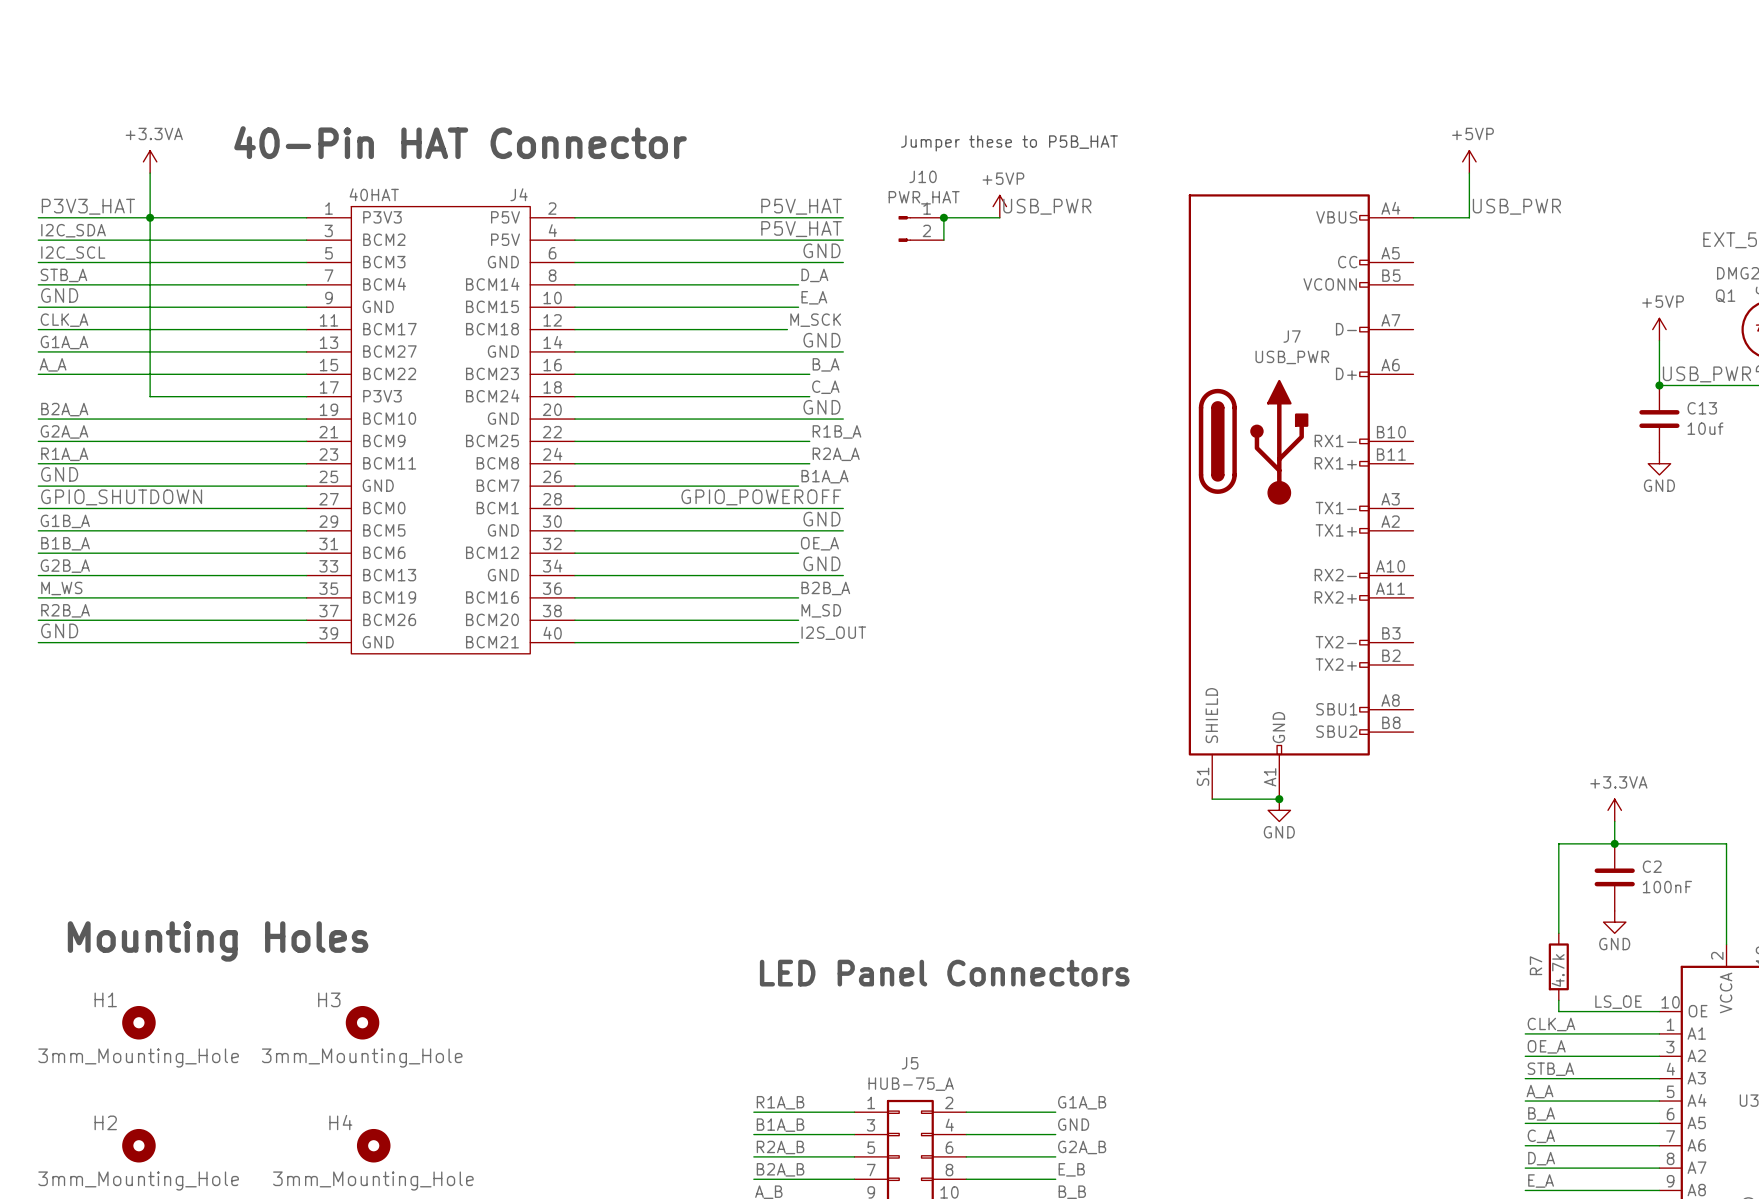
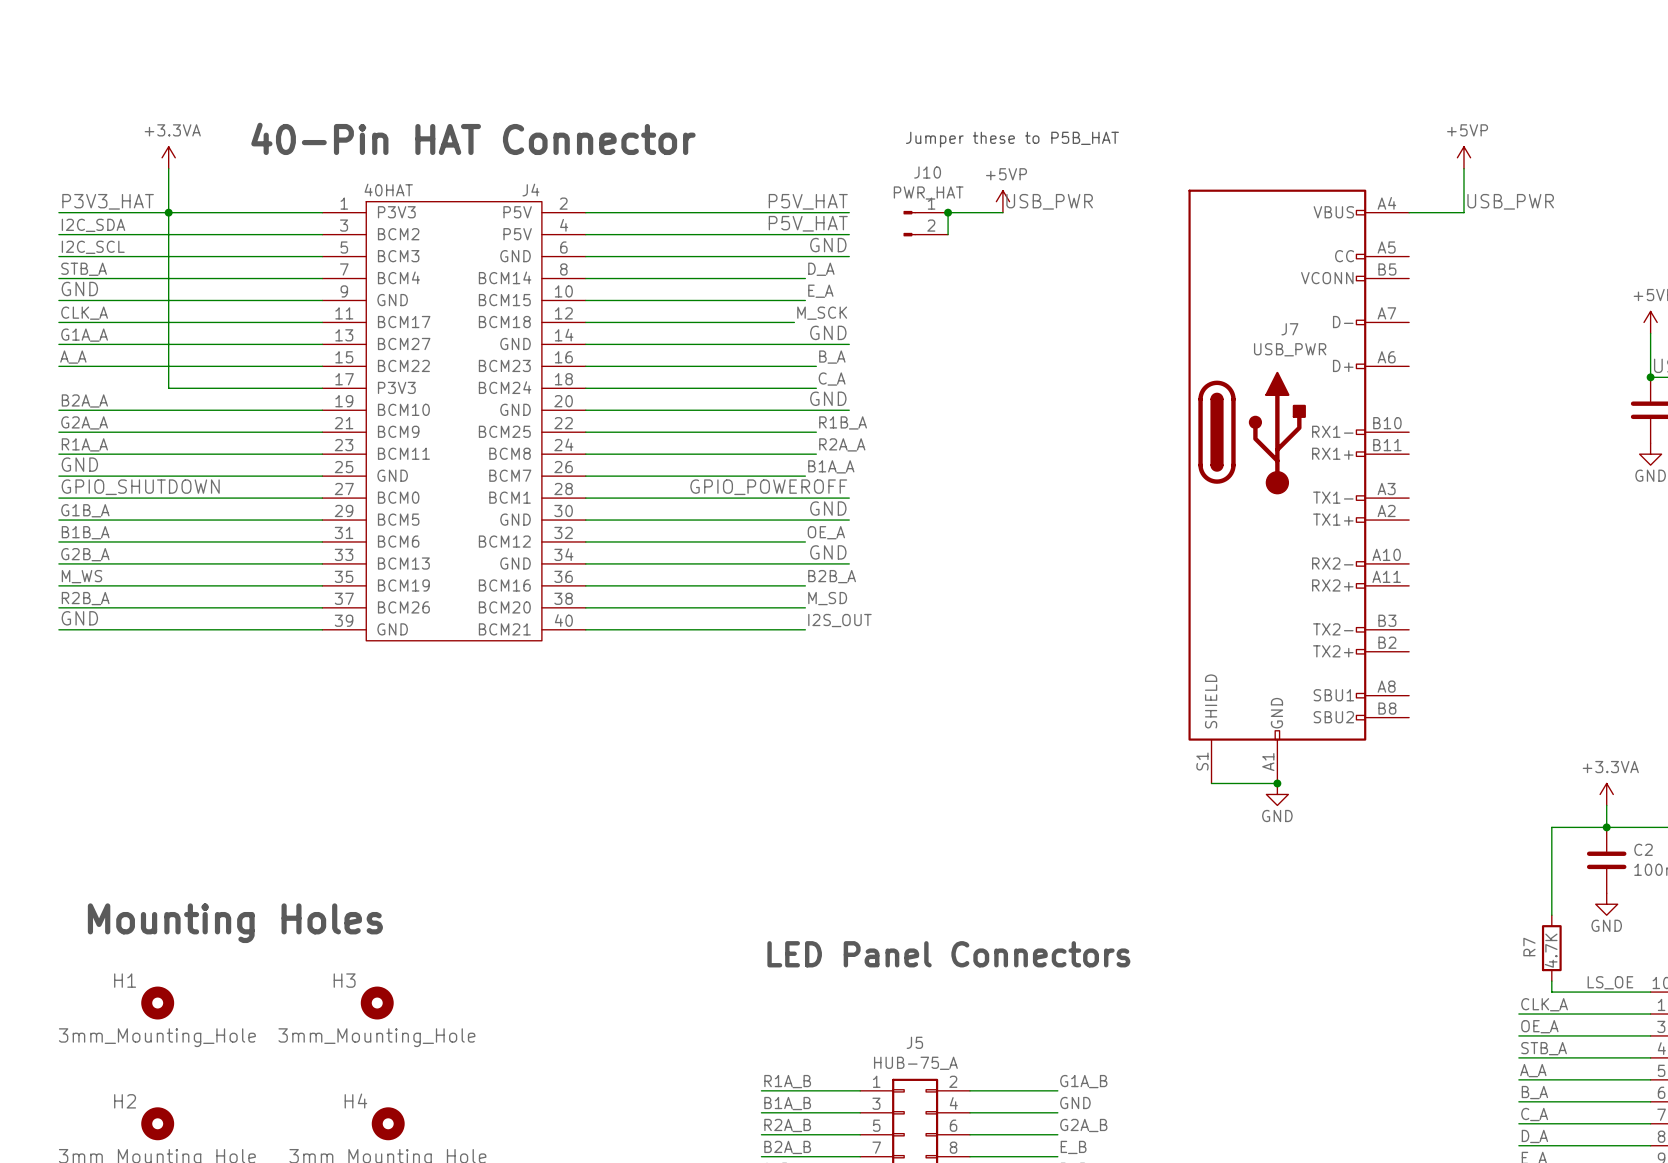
R7 value: 4.7k (1558, 970) -> 4.7K (1551, 950)

